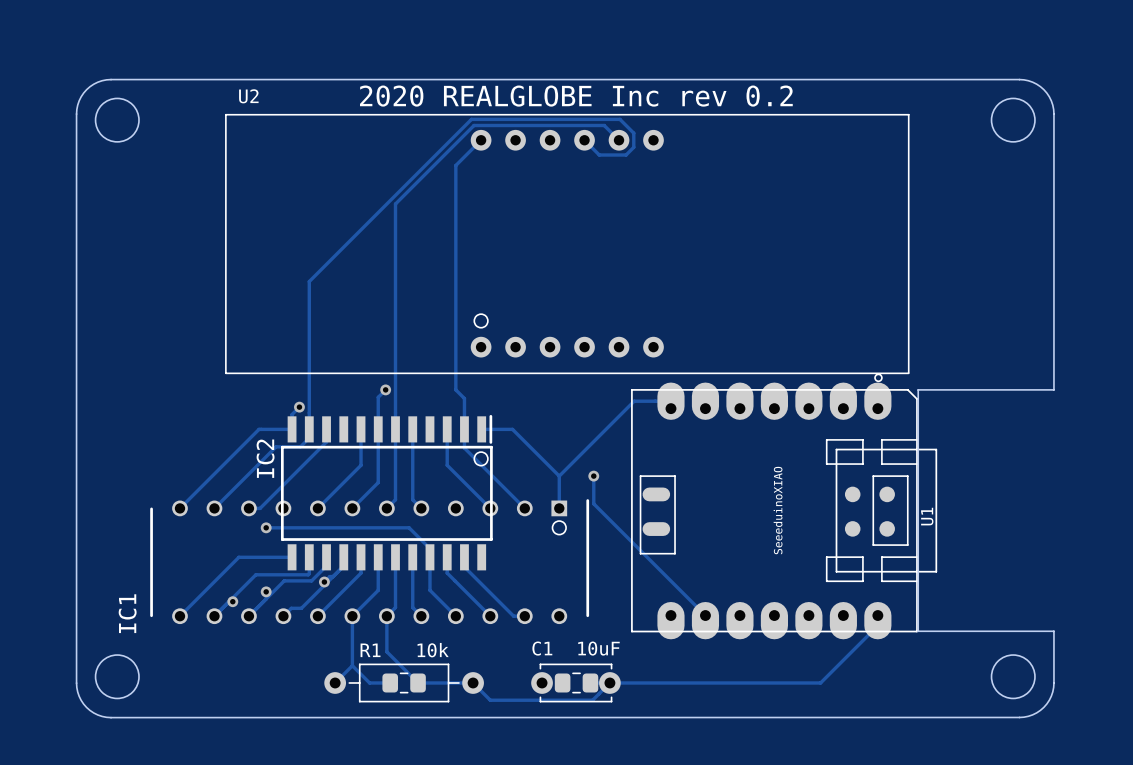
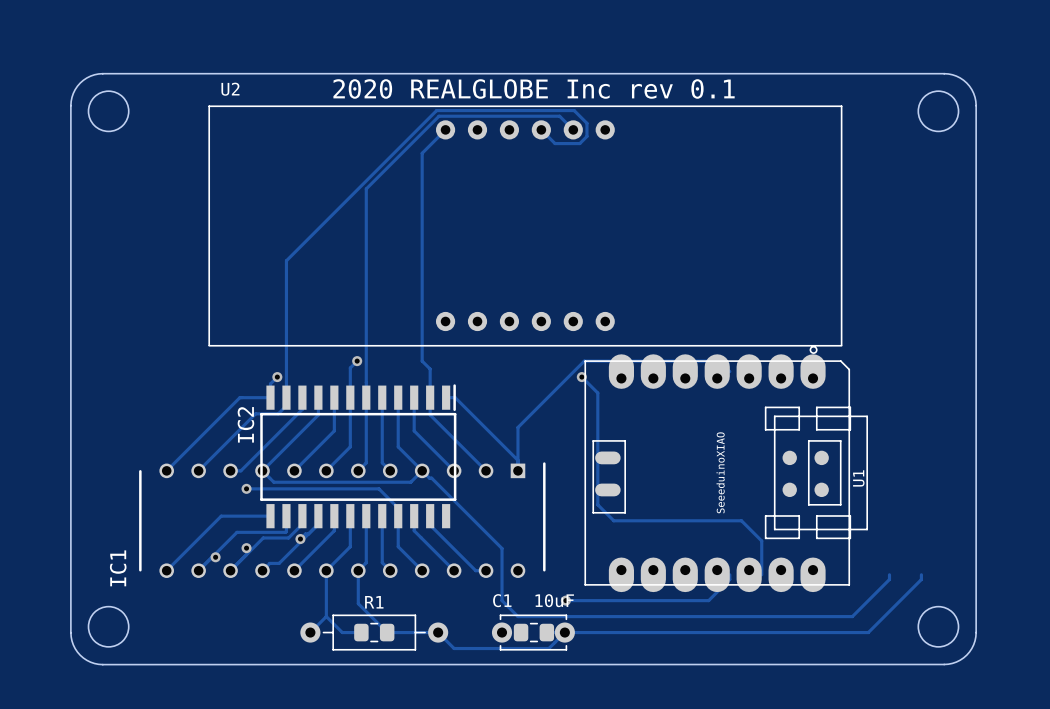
text: 2020 REALGLOBE Inc rev 0.2 (576, 96) -> 2020 REALGLOBE Inc rev 0.1 (534, 88)
drawing: [473, 313, 489, 329] -> none
board edge: (1053, 389) (918, 389) (918, 631) (1053, 631) -> (976, 361) (976, 584)
track: (670, 401) (634, 401) (559, 476) (512, 429) (491, 429) -> (517, 460) (455, 397)
track: none -> (729, 371) (725, 367) (725, 361) (584, 361) (517, 427) (517, 440)
track: none -> (581, 377) (597, 393) (597, 504) (613, 520) (741, 520) (761, 540) (761, 574)
track: none -> (318, 397) (318, 414) (262, 470) (273, 482) (410, 482) (422, 470)
track: none -> (398, 397) (398, 446) (502, 548) (502, 600) (517, 616) (852, 616) (889, 579) (889, 574)
drawing: [473, 451, 489, 467] -> none
track: (593, 476) (593, 503) (705, 615) -> none
via position: (593, 476) -> (581, 377)
drawing: [551, 520, 567, 536] -> none
track: none -> (729, 574) (729, 579) (708, 600) (565, 600)
track: (877, 620) (877, 625) (820, 682) -> (921, 574) (921, 579) (868, 632) (760, 632)
via: none -> (565, 600)
R1 10k name: R1 10k (404, 650) -> R1 (374, 602)

